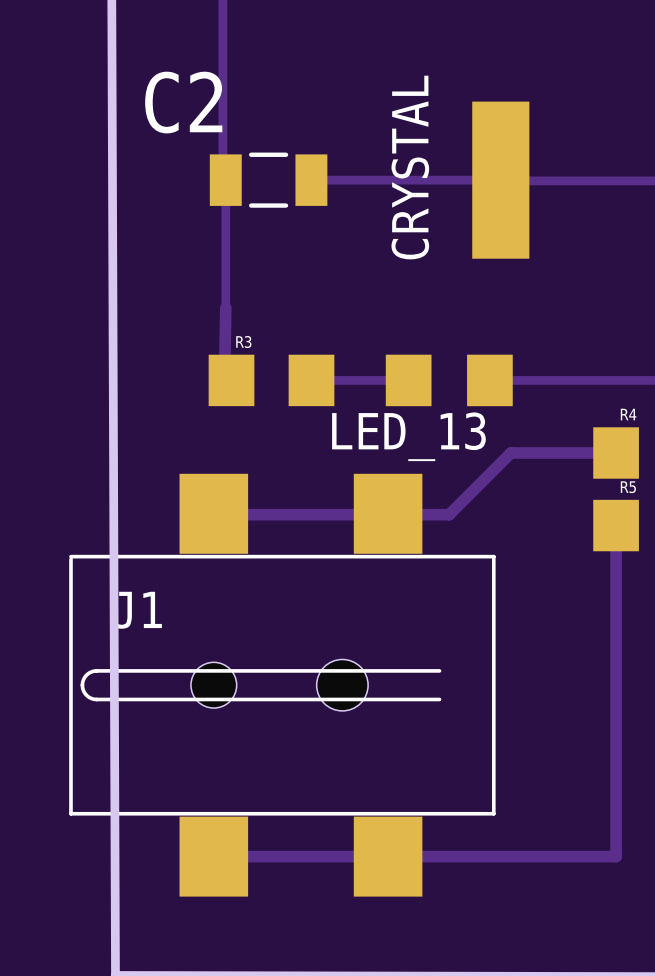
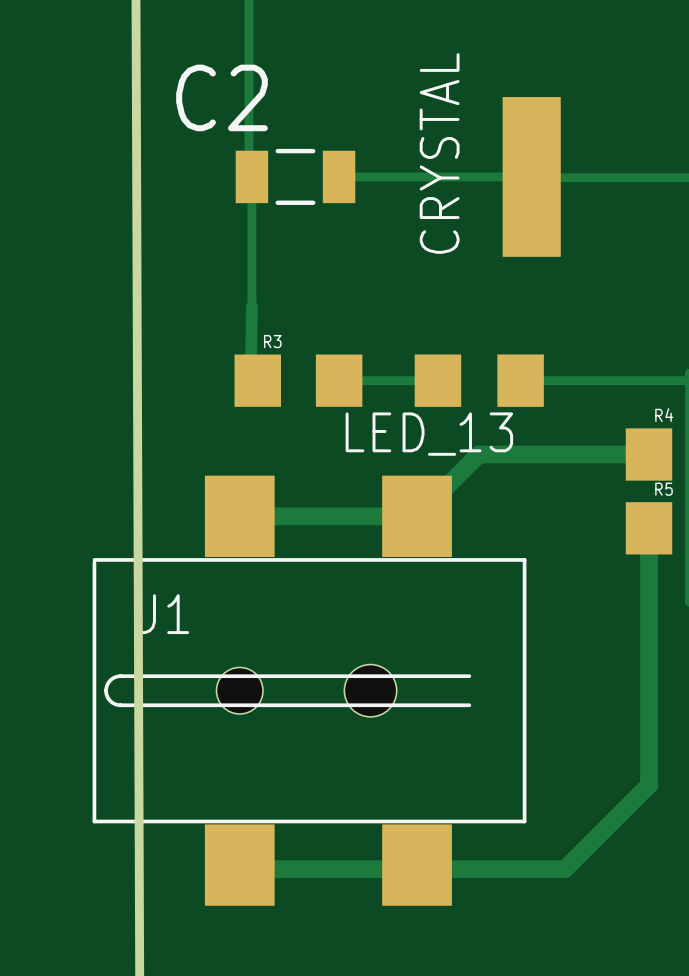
track: (510, 452) (449, 514) (213, 514) -> (542, 454) (478, 454) (417, 516) (239, 516)
track width: thin (510, 452) (616, 452) -> thick (542, 454) (648, 454)
track width: thin (616, 525) (616, 777) -> thick (648, 528) (648, 785)
track: (616, 777) (616, 856) (213, 856) -> (648, 785) (564, 869) (243, 869) (239, 865)

